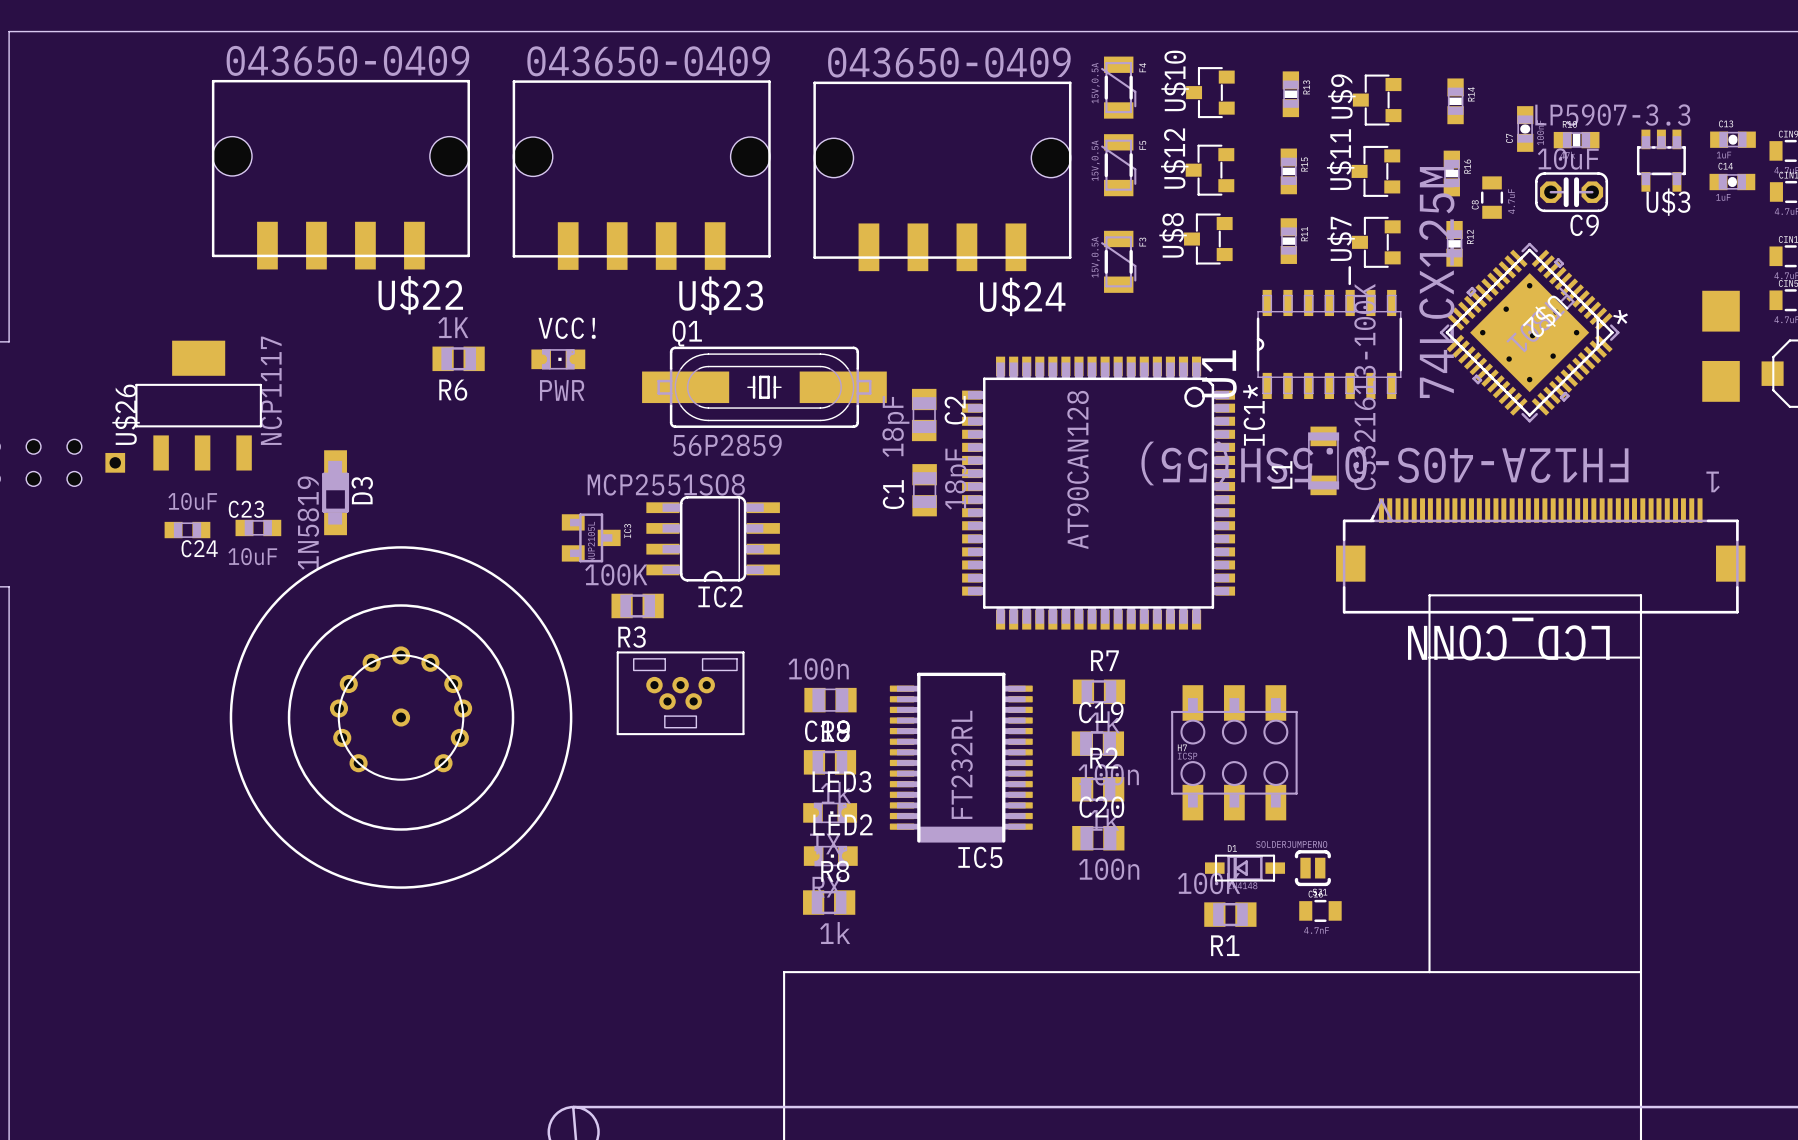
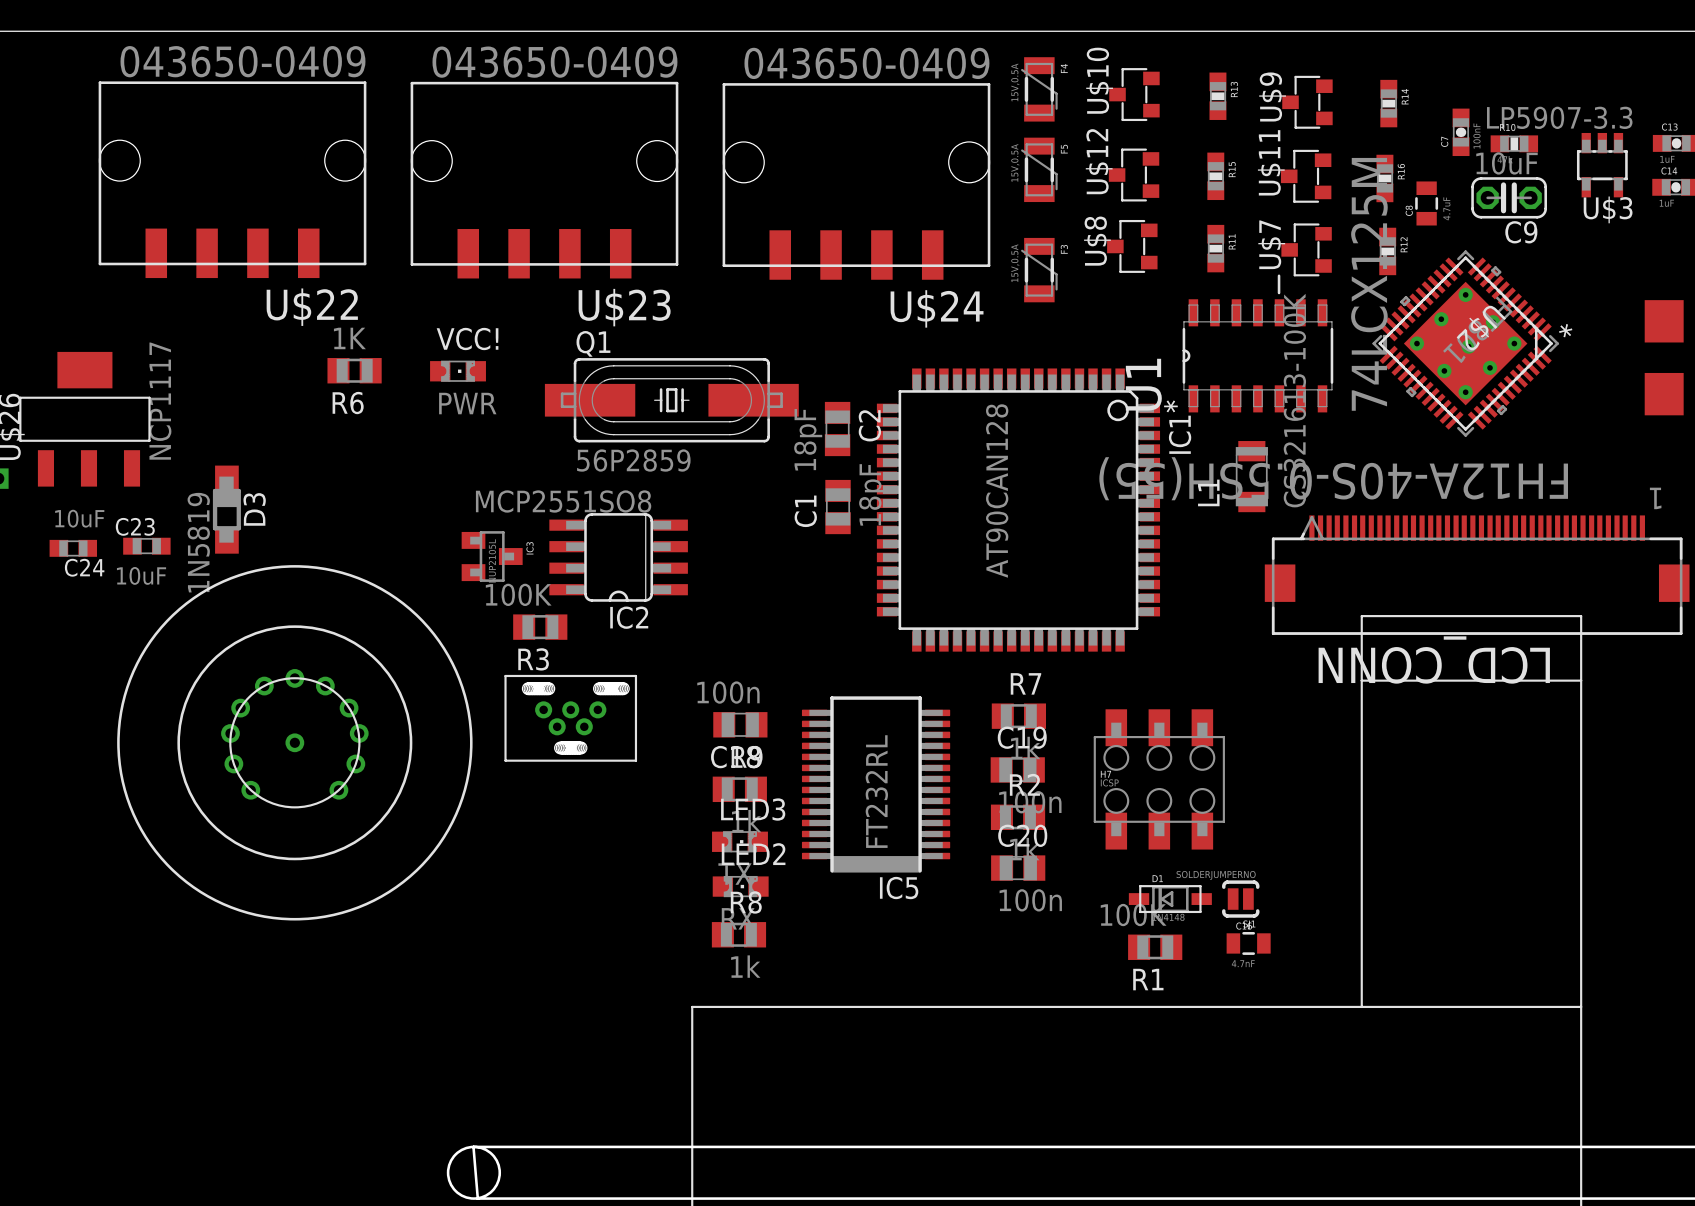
part footprint: [616, 651, 745, 736] -> [504, 674, 638, 762]

